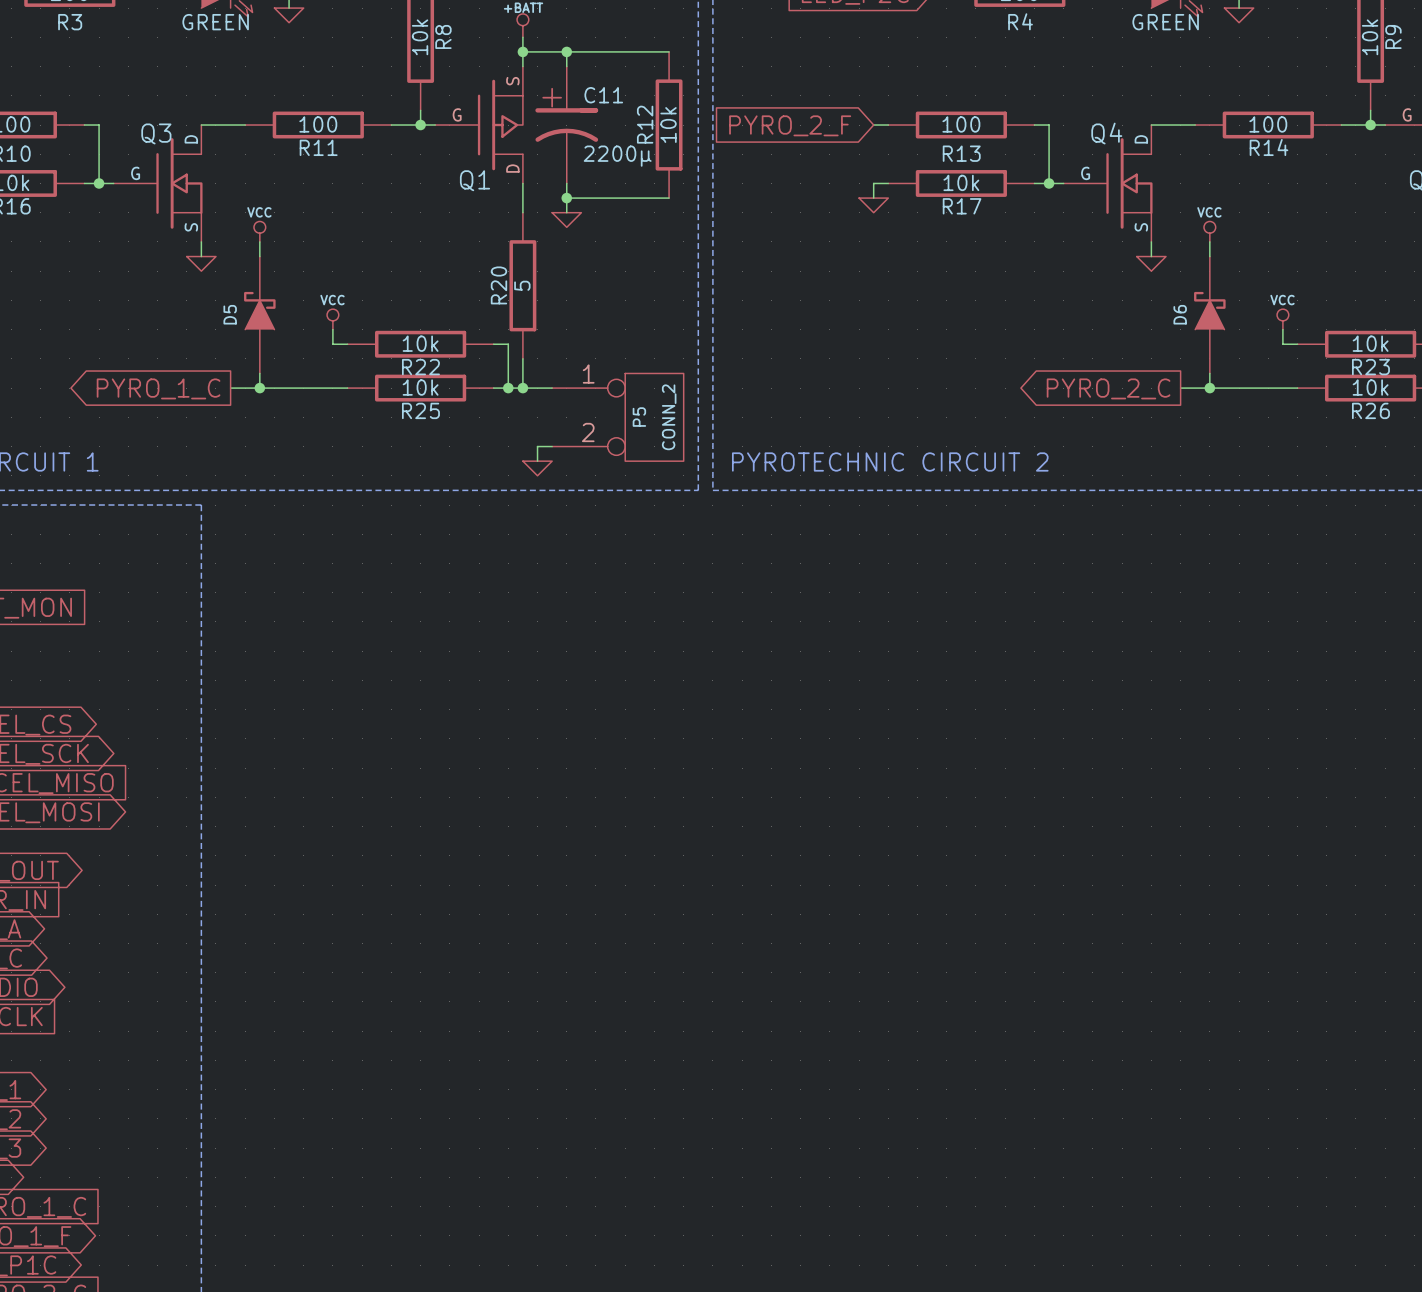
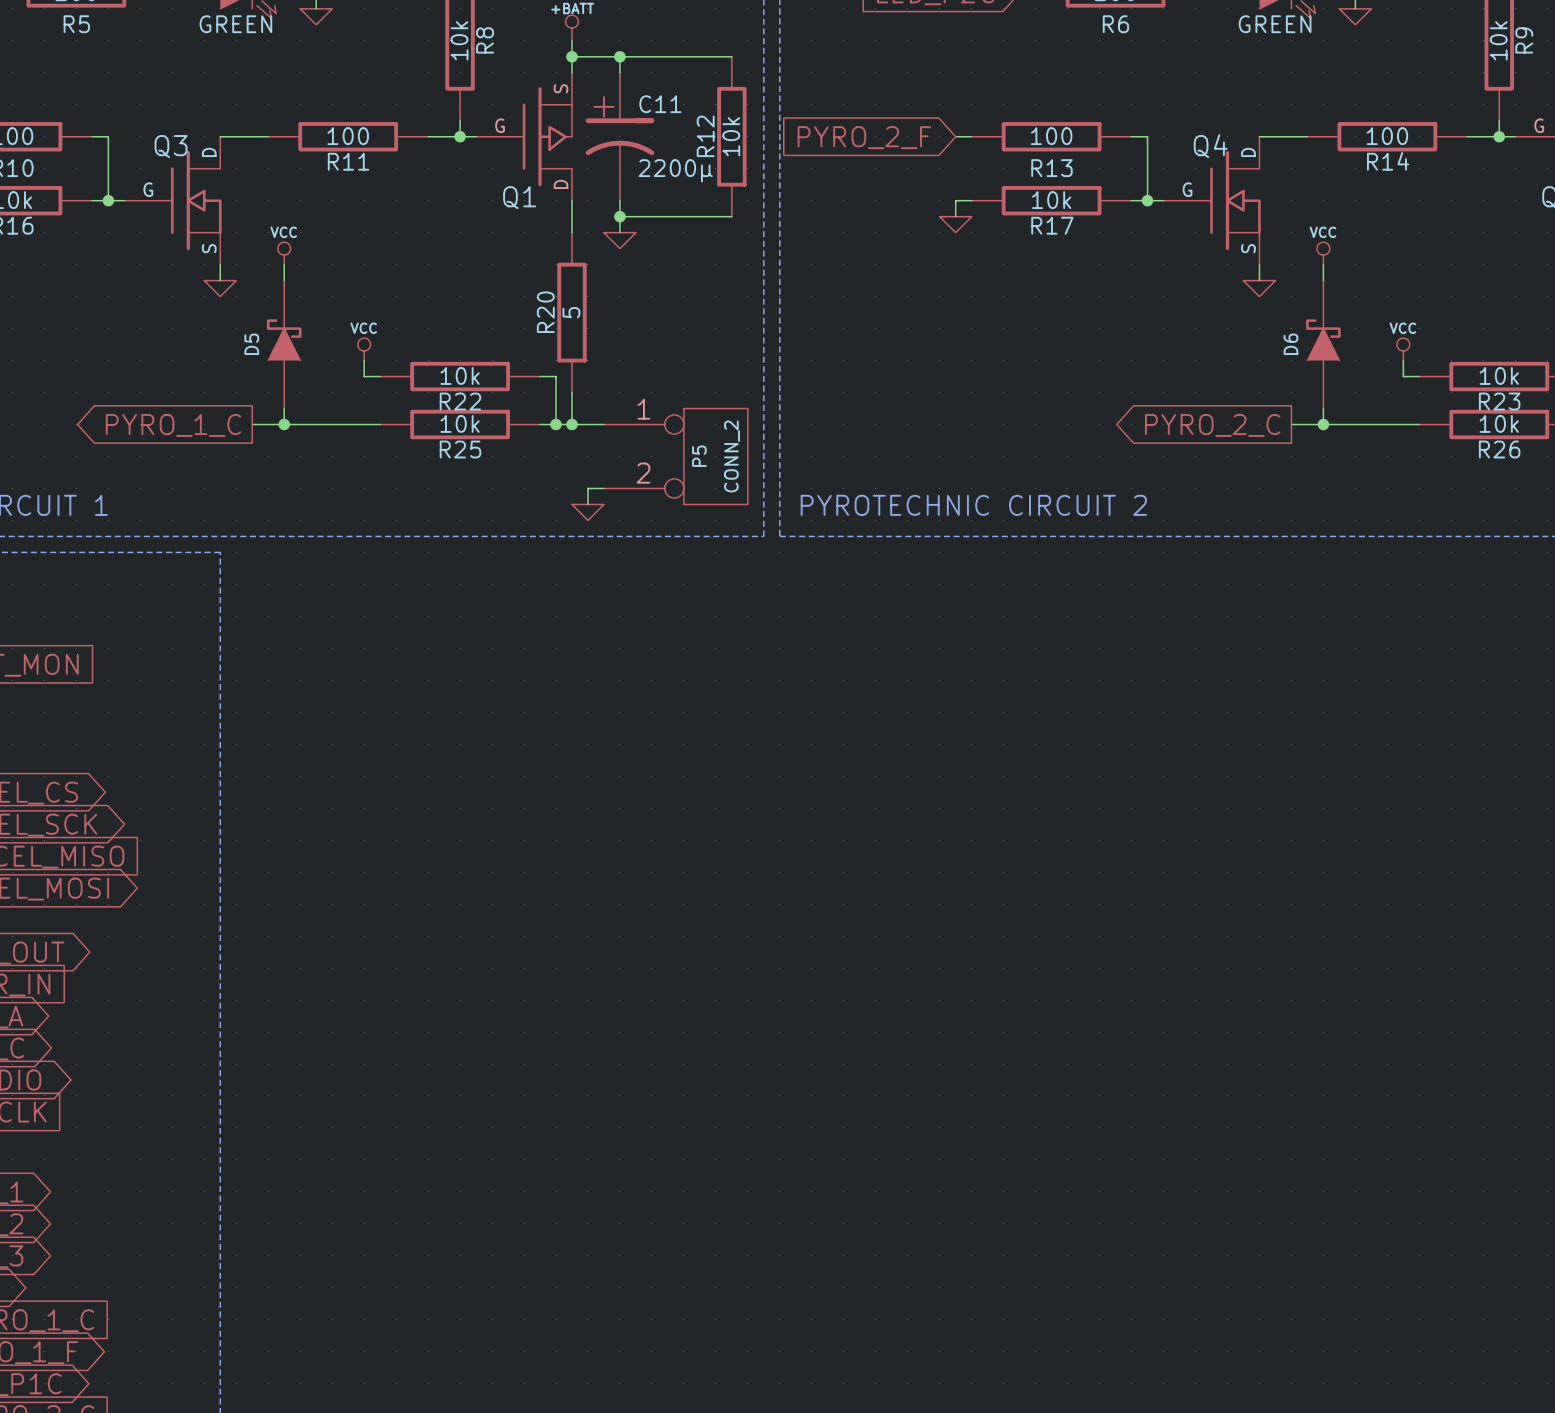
R4 name: R4 (1020, 21) -> R6 (1115, 24)
R3 name: R3 (70, 22) -> R5 (76, 24)

